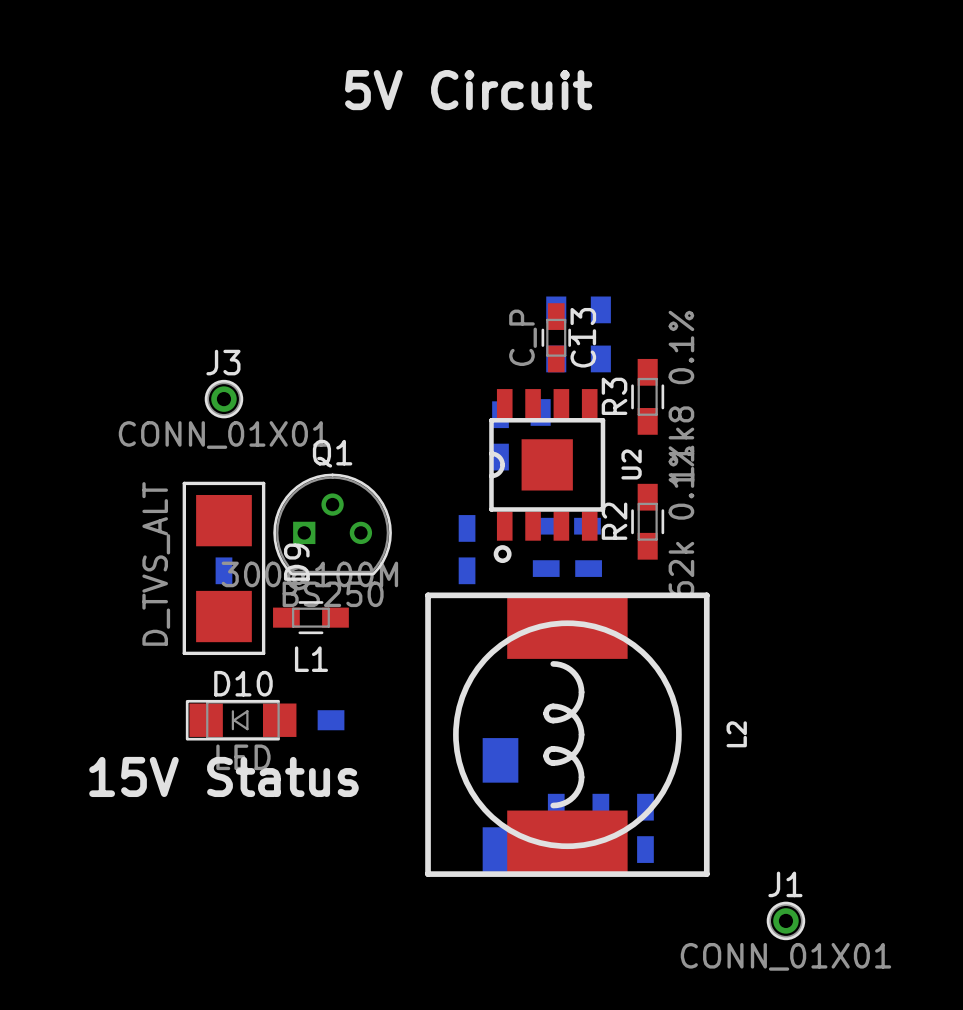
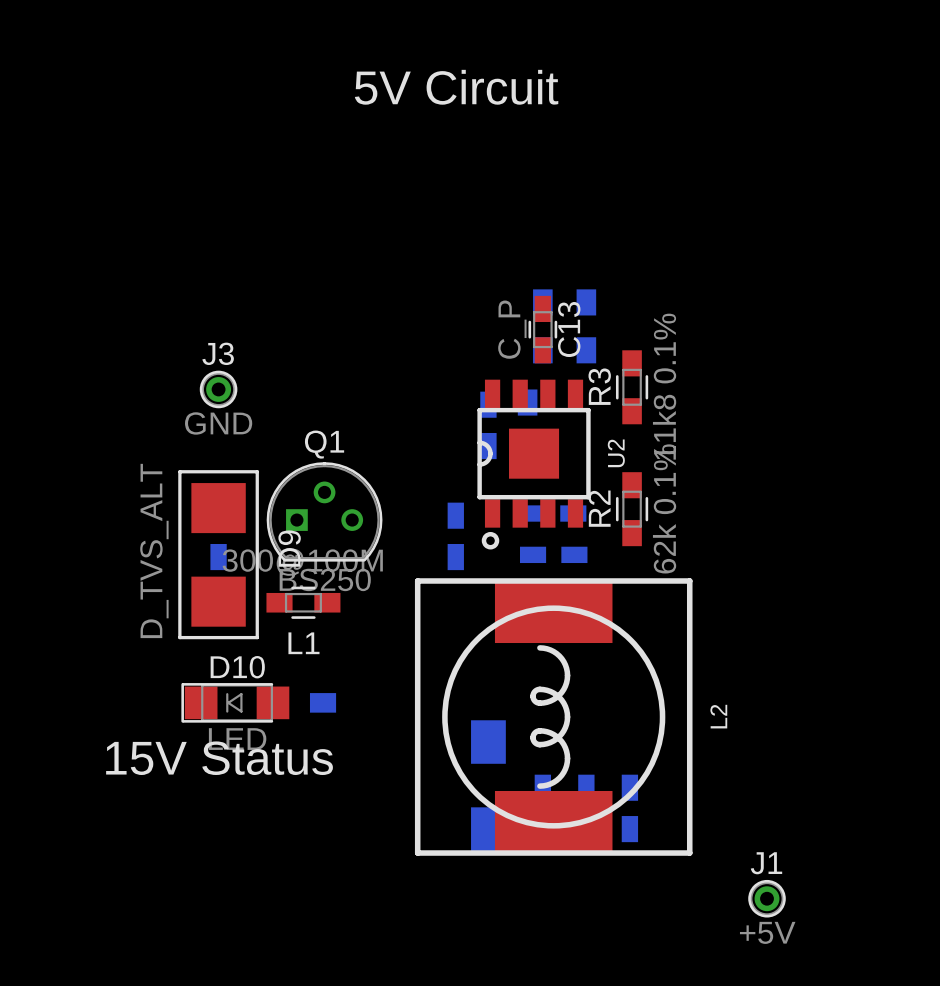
J3 value: CONN_01X01 (223, 435) -> GND (218, 423)
J1 value: CONN_01X01 (785, 956) -> +5V (767, 932)

